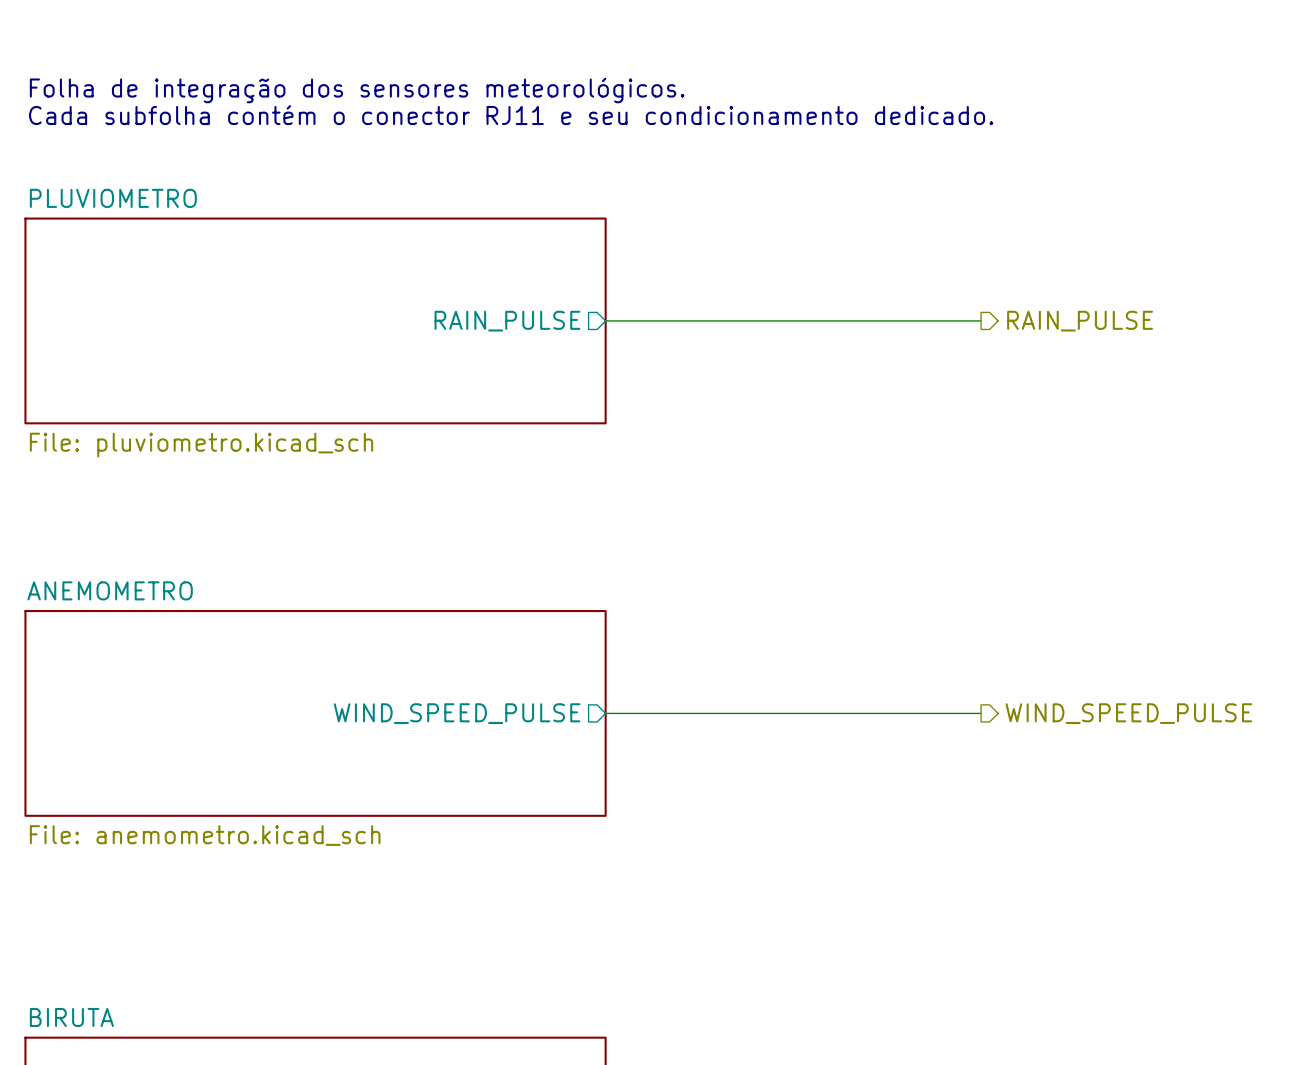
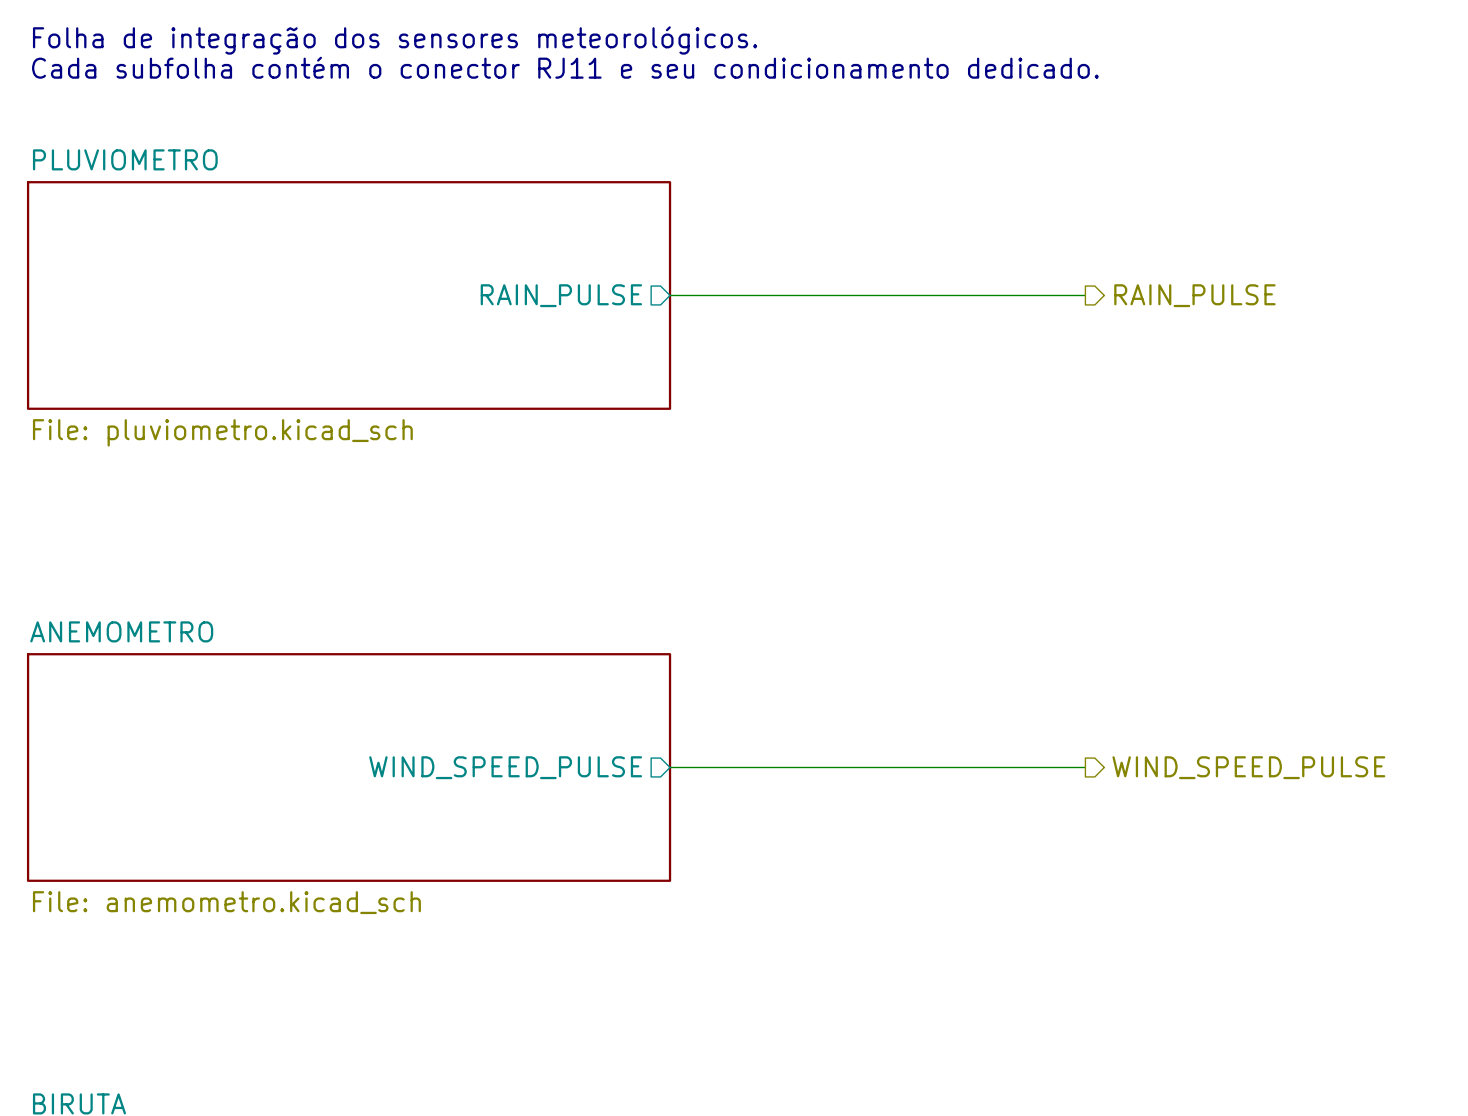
text position: Folha de integração dos sensores meteorológicos. (357, 90) -> Folha de integração dos sensores meteorológicos. (395, 40)
text position: Cada subfolha contém o conector RJ11 e seu condicionamento dedicado. (511, 115) -> Cada subfolha contém o conector RJ11 e seu condicionamento dedicado. (565, 67)
sheet PLUVIOMETRO position: (315, 320) -> (349, 295)
wire: (605, 320) (981, 320) -> (670, 295) (1085, 295)
sheet pin position: RAIN_PULSE (507, 321) -> RAIN_PULSE (561, 295)
hierarchical label position: RAIN_PULSE (1080, 321) -> RAIN_PULSE (1194, 295)

